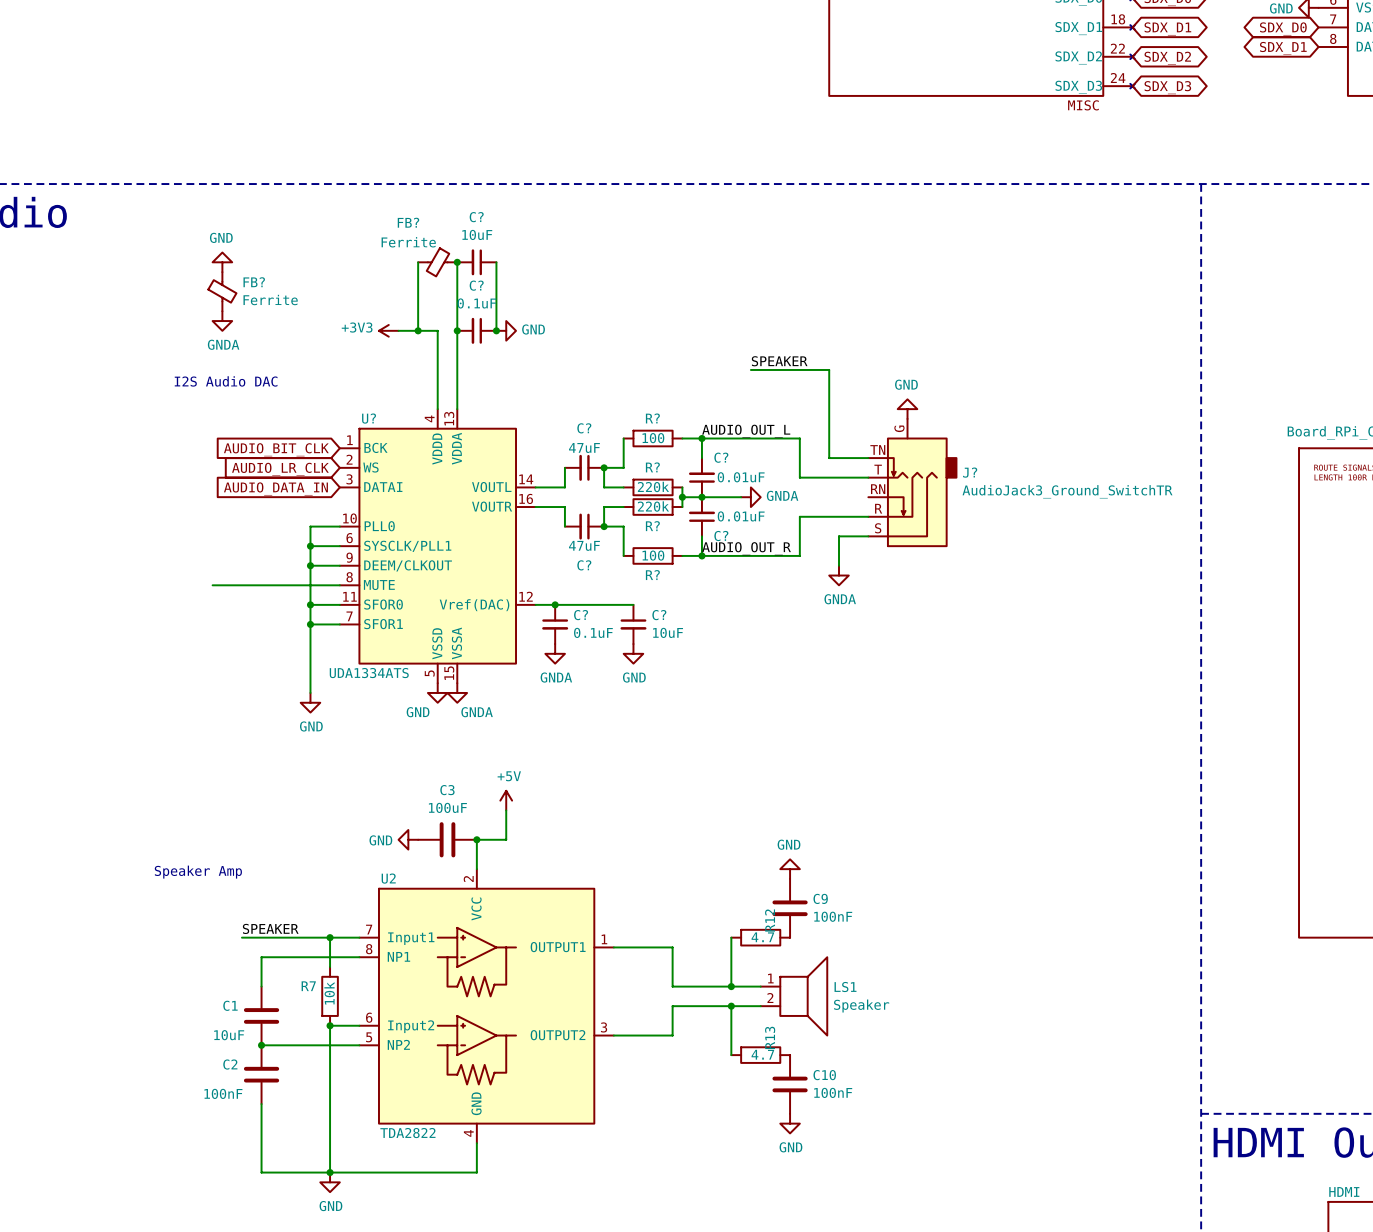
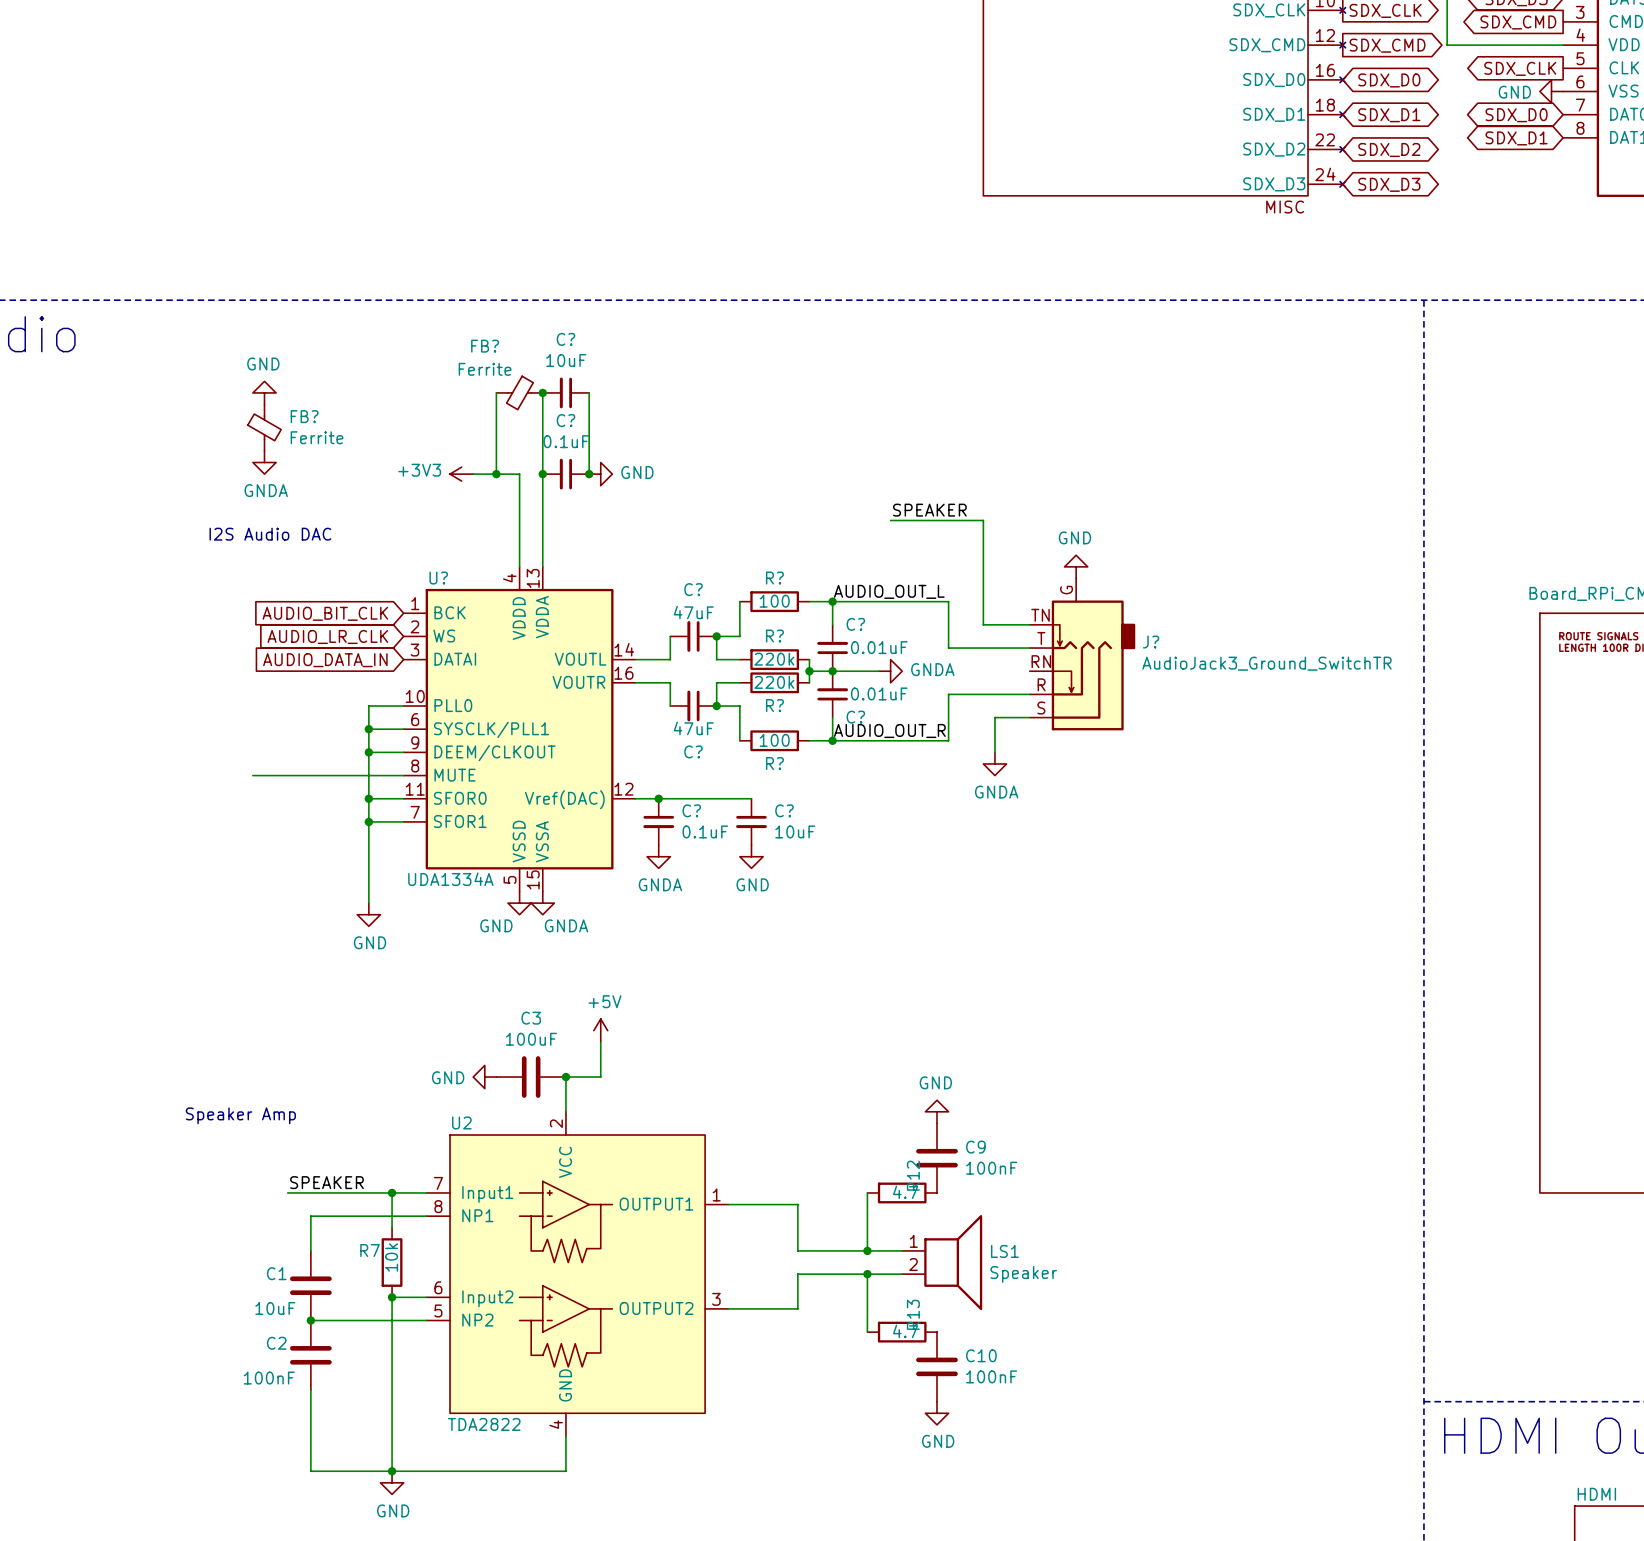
U? value: UDA1334ATS (369, 673) -> UDA1334A (450, 879)

